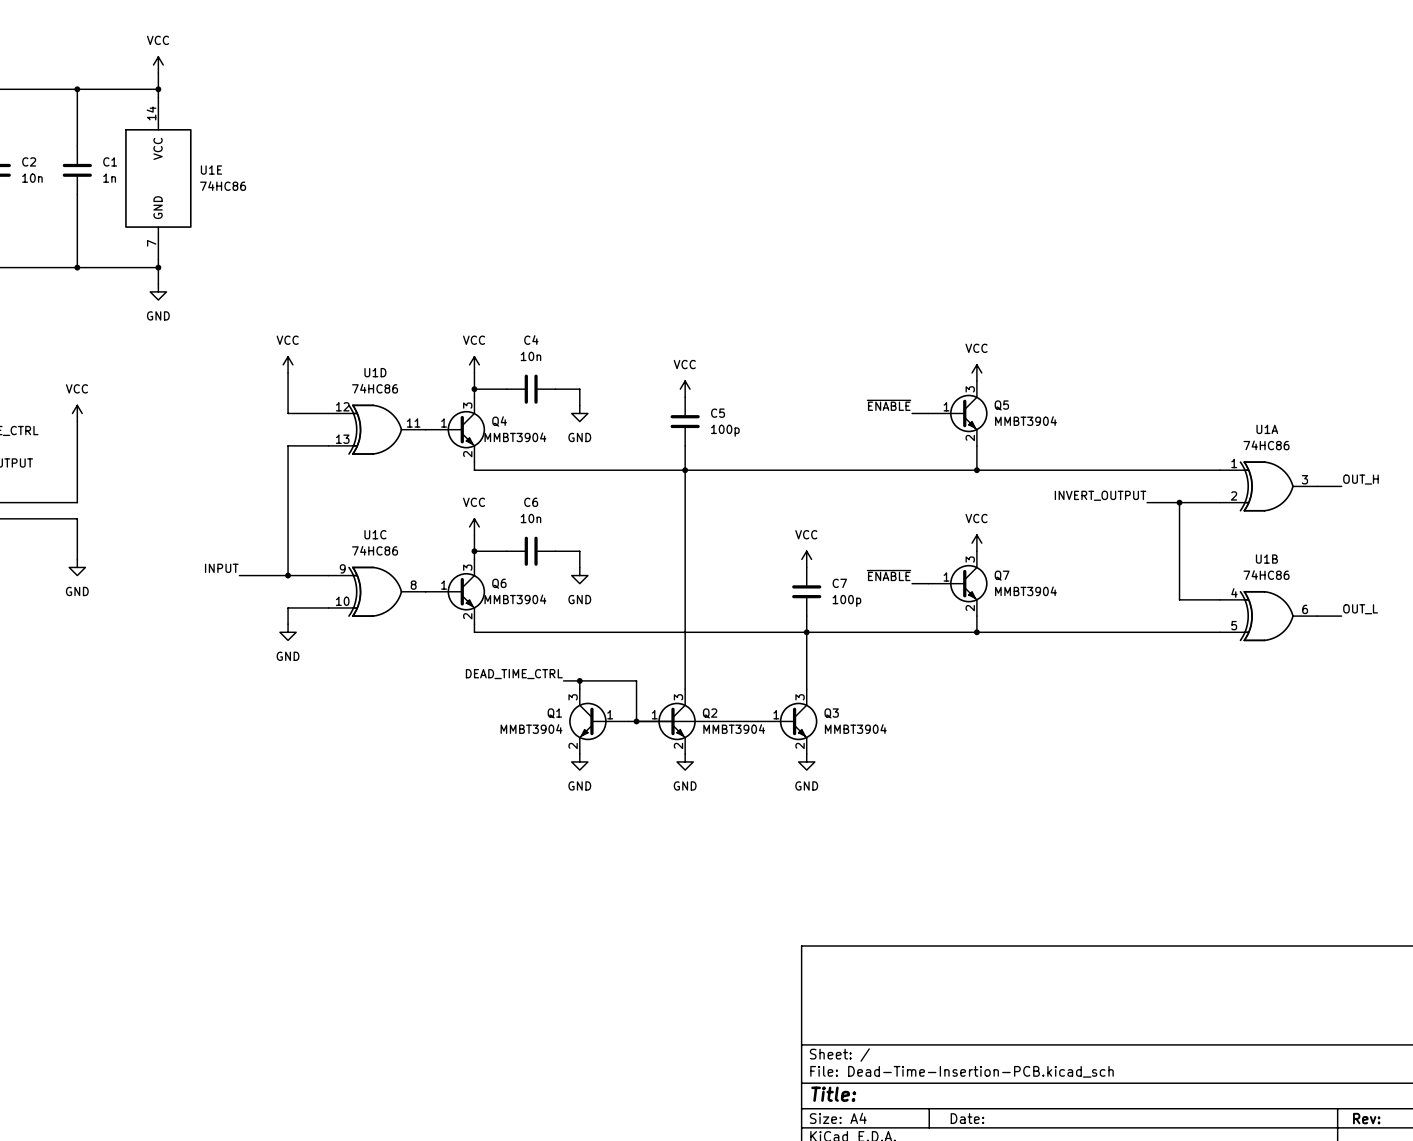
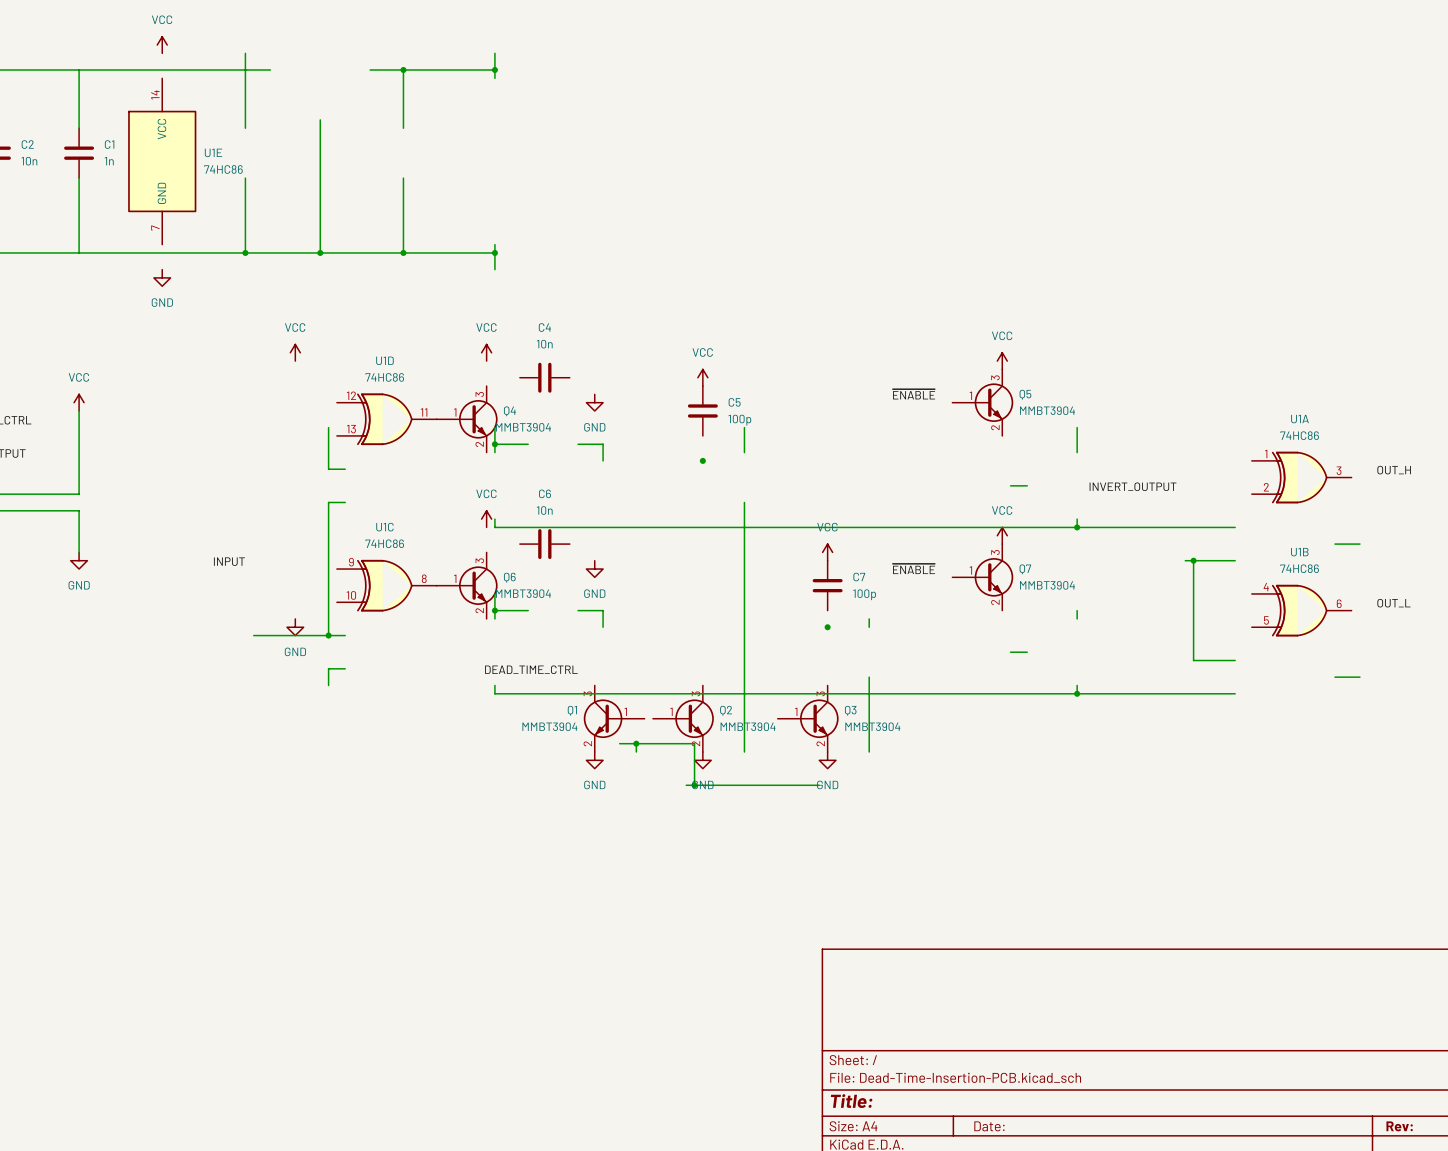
wire: (158, 73) (158, 97) -> none
wire: none -> (245, 53) (245, 128)
wire: none -> (494, 53) (494, 78)
junction: (77, 89) -> none
wire: none -> (162, 69) (270, 69)
junction: (158, 89) -> none
wire: none -> (370, 69) (494, 69)
wire: none -> (403, 69) (403, 128)
junction: none -> (403, 69)
junction: none -> (494, 69)
wire: none -> (320, 119) (320, 252)
wire: none -> (245, 178) (245, 252)
wire: none -> (403, 178) (403, 252)
wire: (158, 259) (158, 283) -> none
wire: none -> (494, 244) (494, 269)
junction: (77, 267) -> none
wire: none -> (162, 252) (494, 252)
junction: (158, 267) -> none
junction: none -> (245, 252)
junction: none -> (320, 252)
junction: none -> (403, 252)
junction: none -> (494, 252)
wire: (288, 372) (288, 413) (328, 413) -> none
wire: (474, 372) (474, 397) -> (494, 427) (494, 452)
wire: (474, 389) (506, 389) -> (494, 444) (528, 444)
junction: (474, 389) -> none
wire: (555, 389) (579, 389) (579, 405) -> (578, 444) (603, 444) (603, 460)
wire: (912, 413) (928, 413) -> (1010, 485) (1027, 485)
wire: none -> (328, 427) (328, 469) (345, 469)
wire: none -> (744, 427) (744, 452)
wire: (328, 445) (288, 445) (288, 575) -> none
wire: (685, 445) (685, 689) -> (744, 502) (744, 752)
wire: (976, 445) (976, 470) -> (1077, 427) (1077, 452)
junction: none -> (494, 444)
wire: (474, 462) (474, 470) (1220, 470) -> none
junction: (976, 470) -> none
wire: (1317, 486) (1341, 486) -> (1334, 544) (1359, 544)
wire: (1147, 502) (1220, 502) -> none
wire: (1179, 502) (1179, 599) (1220, 599) -> (1193, 560) (1193, 660) (1235, 660)
junction: (1179, 502) -> none
wire: none -> (345, 502) (328, 502) (328, 635)
wire: none -> (494, 519) (494, 527) (1235, 527)
wire: none -> (1077, 519) (1077, 527)
wire: (474, 535) (474, 559) -> (494, 593) (494, 618)
junction: none -> (1077, 527)
wire: (474, 551) (506, 551) -> (494, 610) (528, 610)
junction: (474, 551) -> none
wire: (555, 551) (579, 551) (579, 567) -> (578, 610) (603, 610) (603, 627)
wire: none -> (1185, 560) (1235, 560)
junction: none -> (1193, 560)
wire: (239, 575) (328, 575) -> (253, 635) (345, 635)
junction: (288, 575) -> none
wire: (912, 583) (928, 583) -> (1010, 652) (1027, 652)
wire: (328, 607) (288, 607) (288, 624) -> none
junction: none -> (494, 610)
wire: (806, 616) (806, 689) -> (869, 677) (869, 752)
wire: (976, 616) (976, 632) -> none
wire: none -> (1077, 610) (1077, 618)
wire: (1317, 616) (1341, 616) -> (1334, 677) (1359, 677)
wire: (474, 624) (474, 632) (1220, 632) -> none
wire: none -> (869, 618) (869, 627)
junction: (976, 632) -> none
junction: none -> (328, 635)
wire: none -> (345, 668) (328, 668) (328, 685)
wire: (563, 680) (636, 680) (636, 721) -> (619, 743) (694, 743) (694, 785)
wire: (579, 680) (579, 689) -> (636, 743) (636, 752)
junction: (579, 680) -> none
wire: none -> (494, 685) (494, 693) (1235, 693)
wire: none -> (1077, 685) (1077, 693)
junction: none -> (1077, 693)
wire: (628, 721) (758, 721) -> (686, 785) (819, 785)
junction position: (636, 721) -> (636, 743)
junction: none -> (694, 785)

